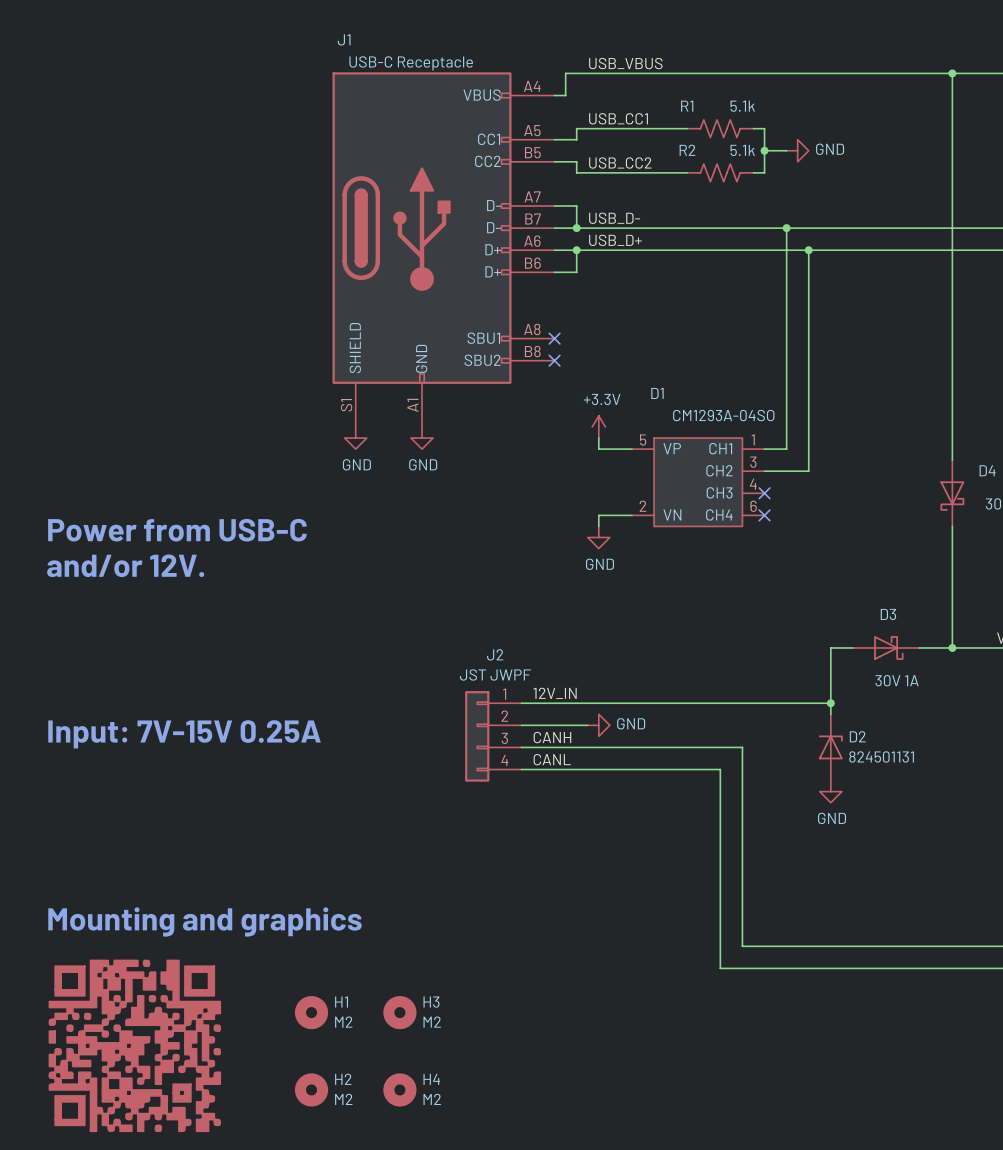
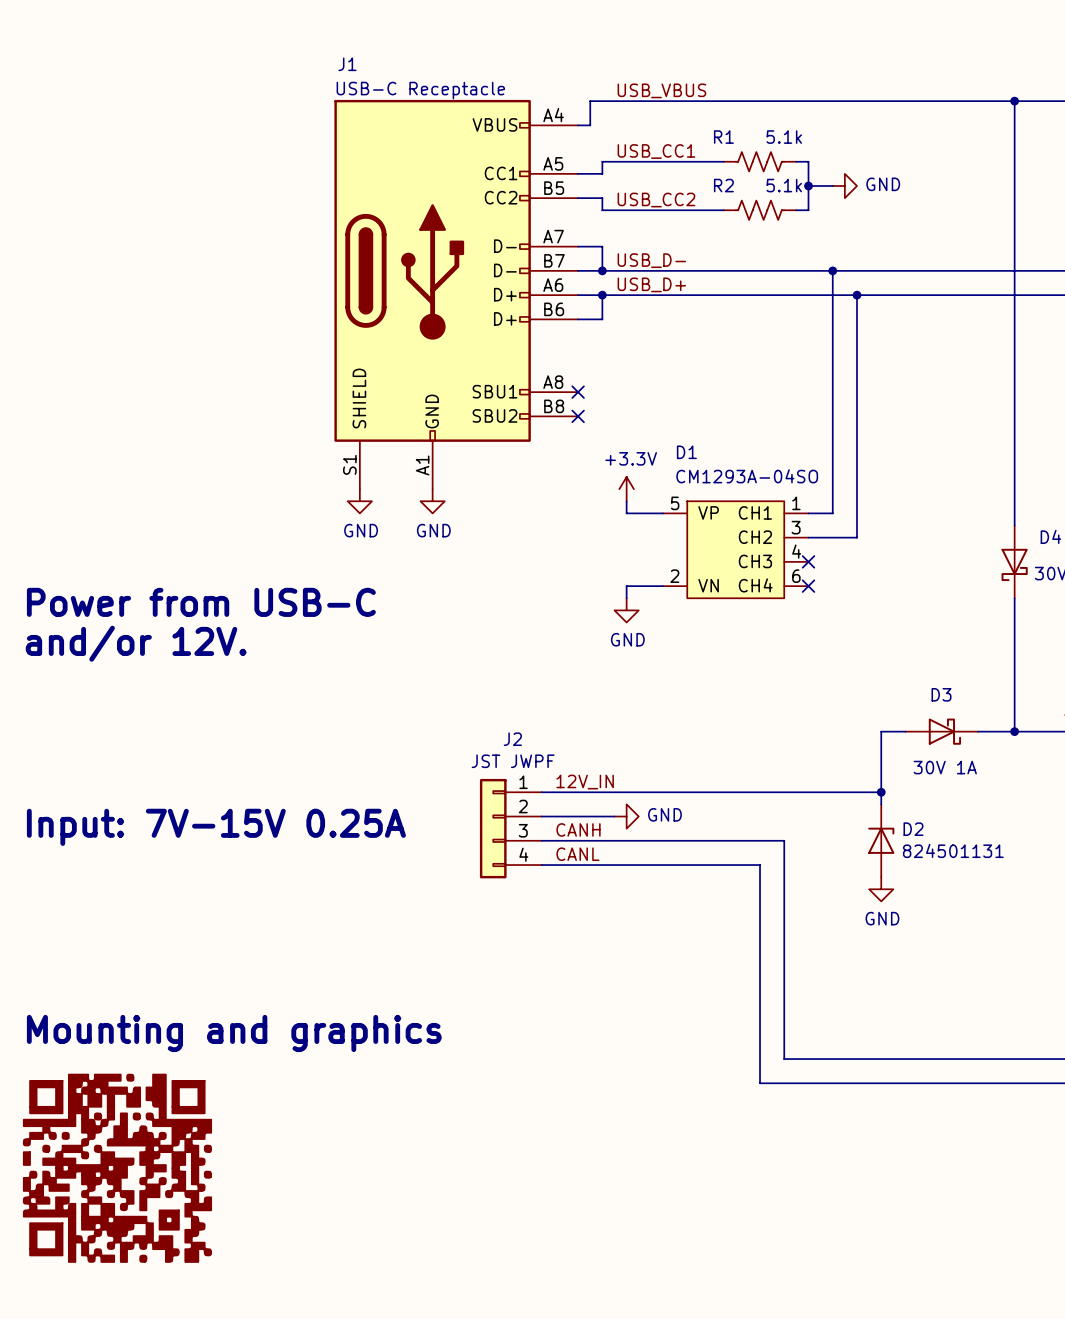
H1: M2 (311, 1012) -> none
H3: M2 (399, 1012) -> none
H2: M2 (311, 1089) -> none
H4: M2 (399, 1089) -> none

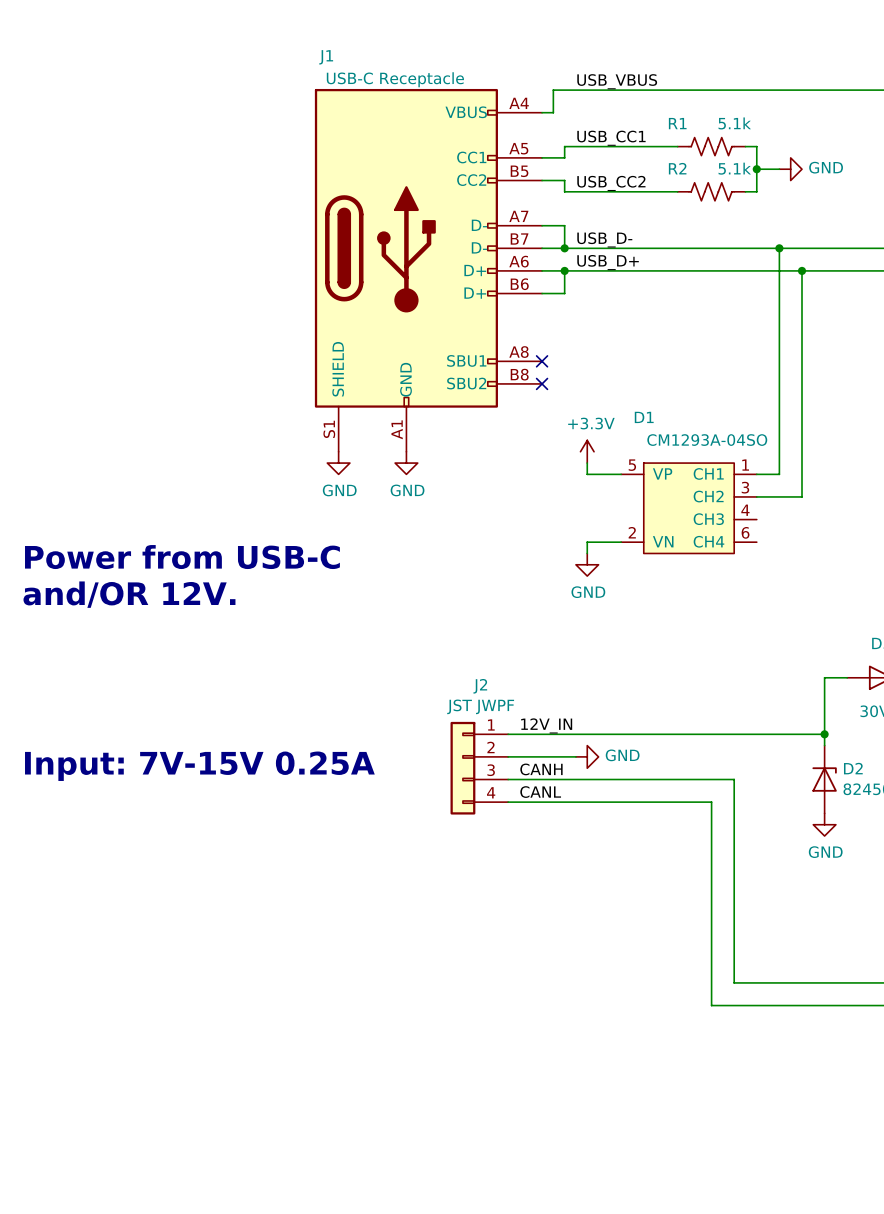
no-connect mark: (808, 561) -> none
no-connect mark: (808, 586) -> none
text: and/or 12V. (136, 643) -> and/OR 12V. (129, 594)
text: Mounting and graphics (234, 1033) -> none
part: (117, 1168) -> none

